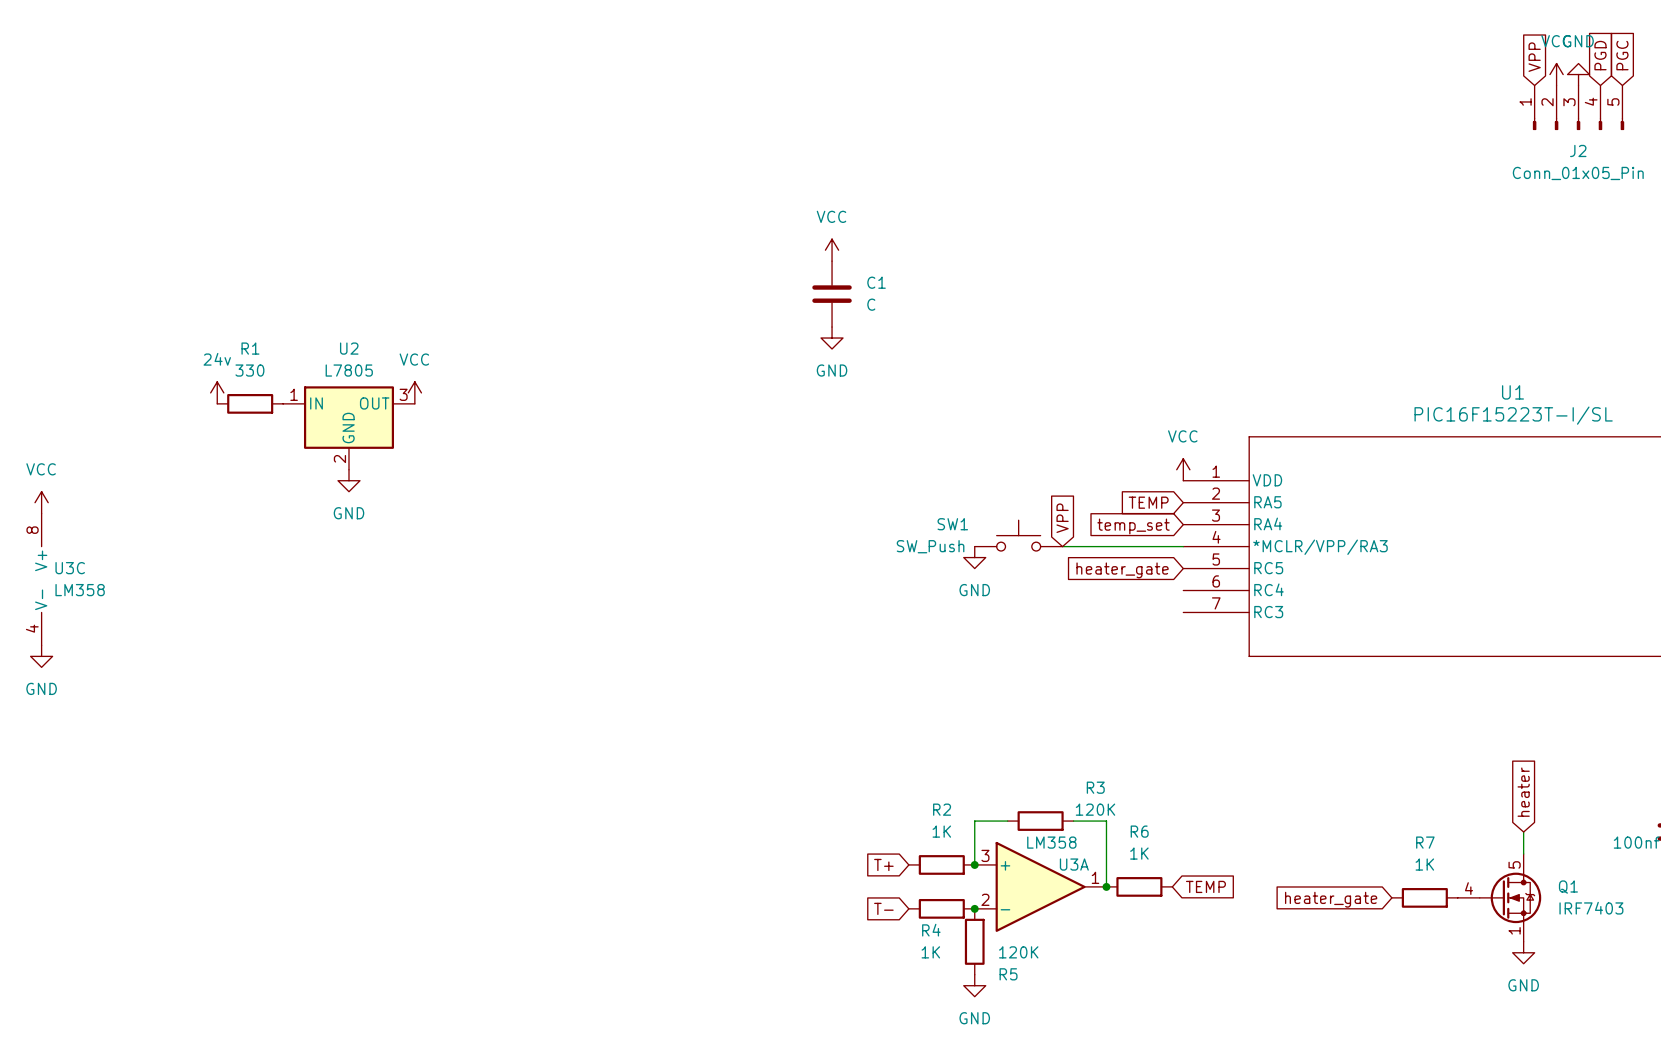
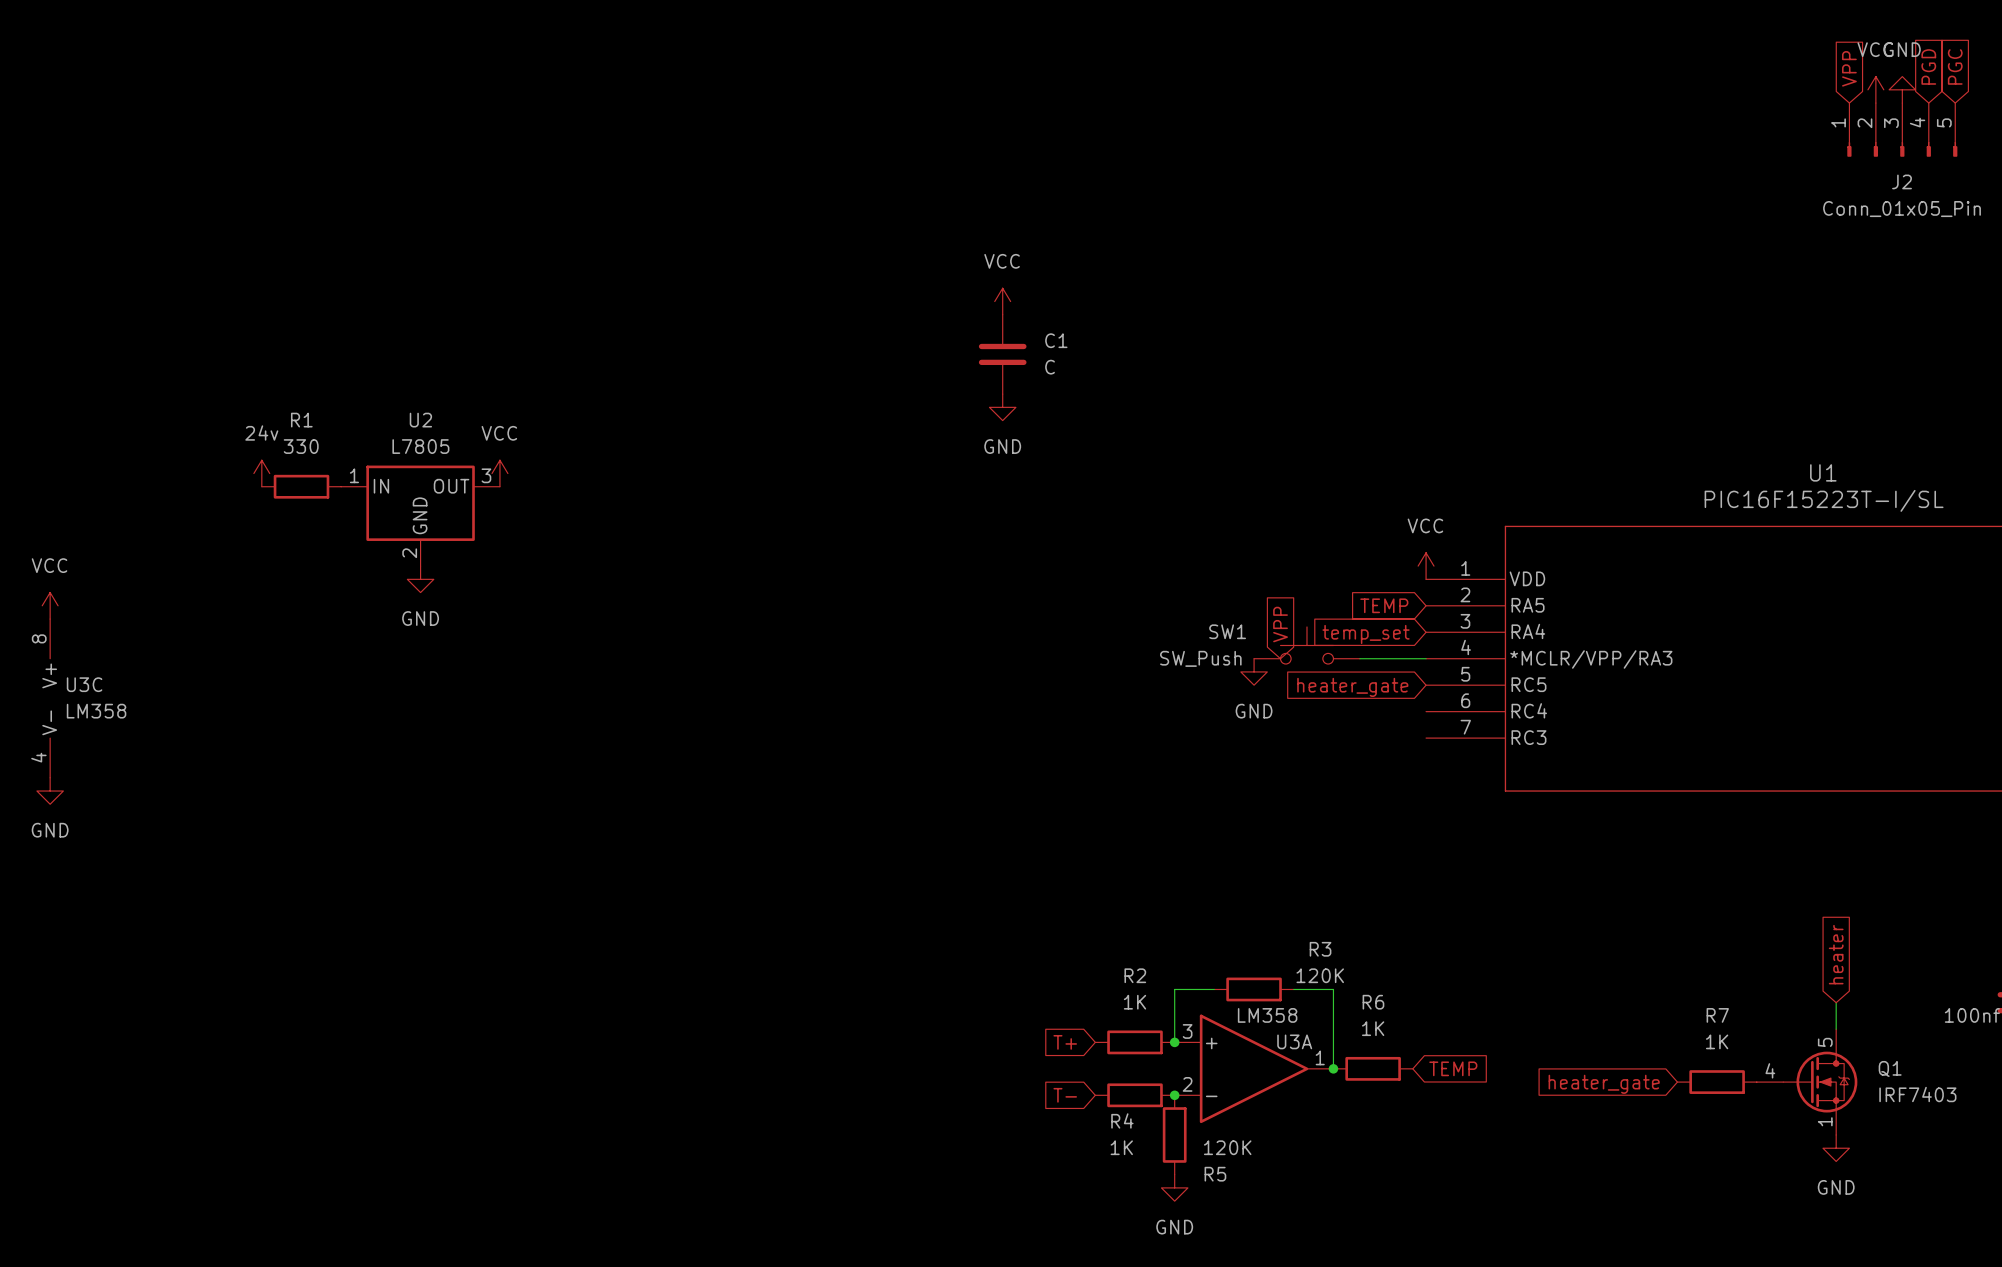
SW1 position: (1018, 535) -> (1306, 645)
wire: (1062, 546) (1128, 546) -> none
power symbol position: GND (974, 557) -> GND (1254, 671)

